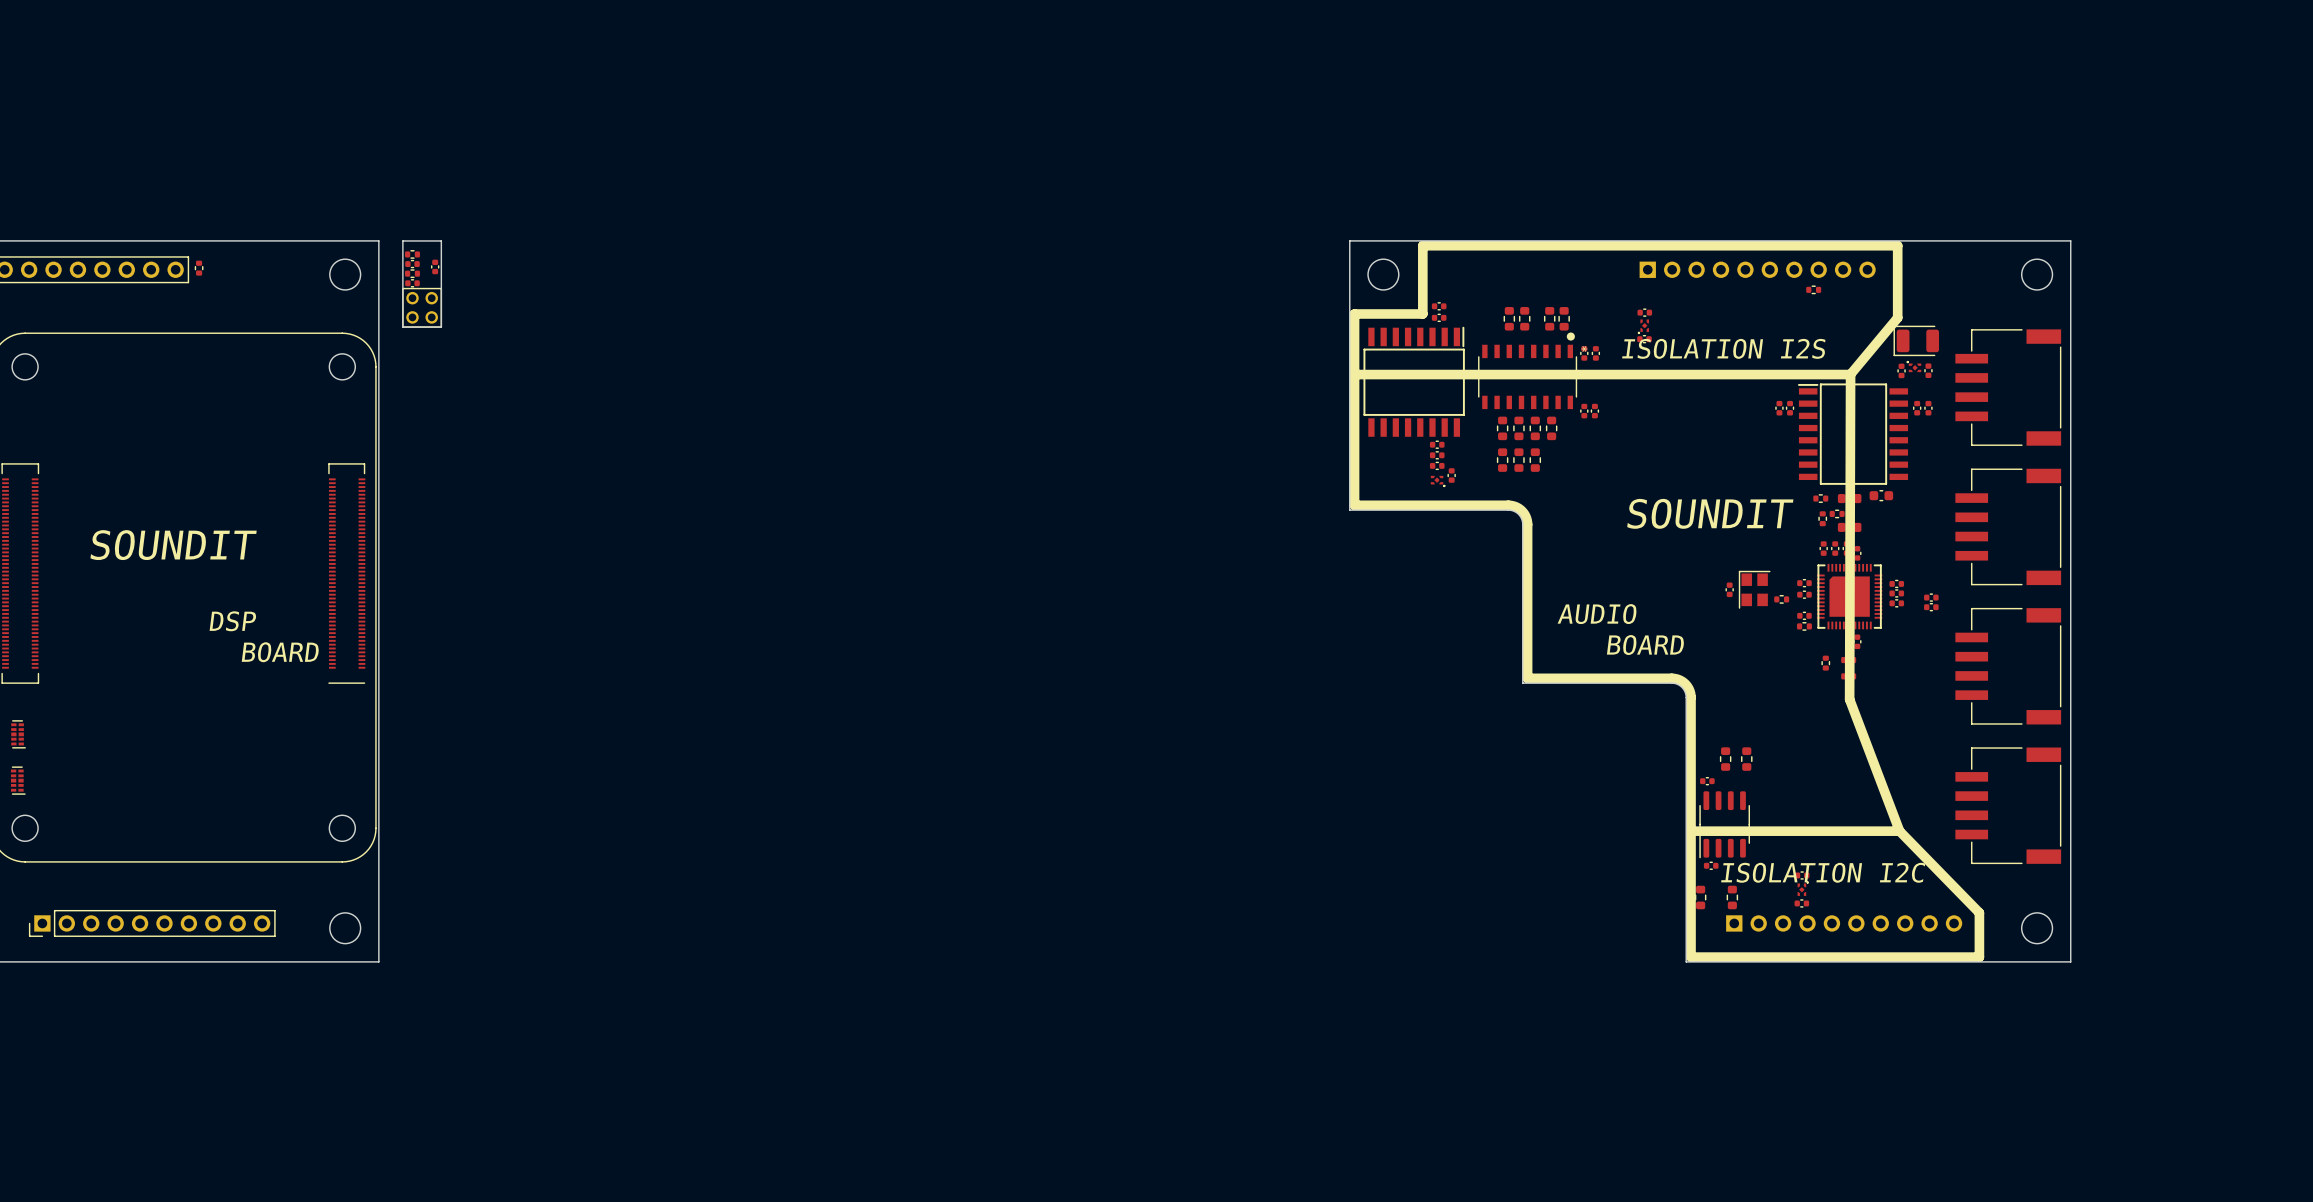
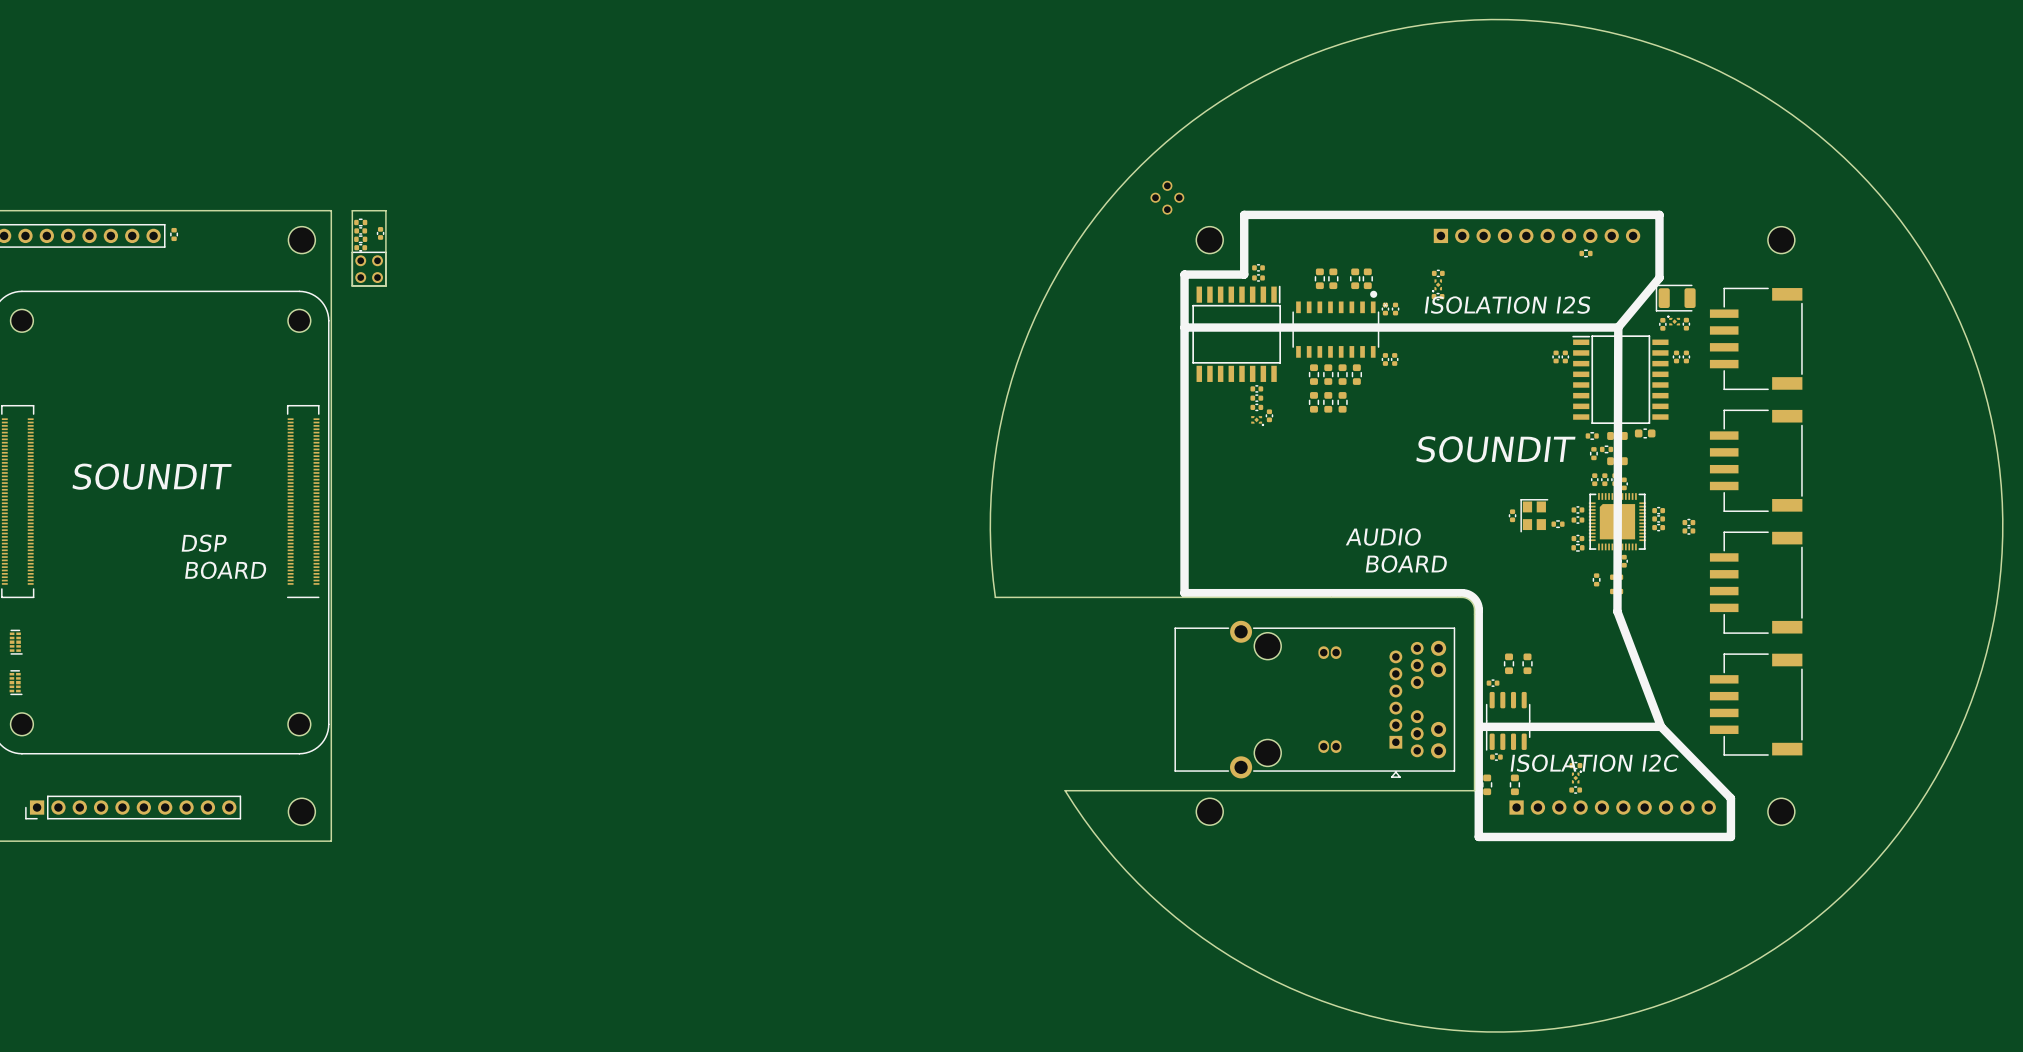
part: none -> (1167, 197)
line: (1354, 505) (1508, 505) (1521, 510) (1527, 524) (1527, 678) -> (1184, 441) (1184, 593) (1335, 593)
board edge: (1522, 683) (1522, 524) (1518, 514) (1508, 510) (1349, 510) (1349, 240) (2070, 240) (2070, 961) (1686, 961) (1686, 904) -> (1331, 597) (995, 597) (990, 530) (991, 496) (996, 445) (1011, 380) (1035, 316) (1058, 271) (1076, 243) (1117, 189) (1166, 142) (1220, 101) (1263, 76) (1309, 55) (1341, 43) (1390, 30) (1440, 22) (1491, 19) (1541, 21) (1575, 25) (1625, 36) (1673, 51) (1719, 71) (1764, 96) (1792, 114) (1831, 146) (1868, 181) (1900, 220) (1929, 262) (1953, 307) (1972, 353) (1987, 402) (1997, 452) (2002, 502) (2002, 553) (1996, 603) (1986, 653) (1971, 701) (1951, 748) (1926, 792) (1898, 834) (1865, 872) (1828, 907) (1788, 939) (1746, 966) (1700, 989) (1653, 1007) (1604, 1020) (1554, 1028) (1503, 1031) (1453, 1030) (1403, 1023) (1353, 1011) (1306, 994) (1260, 973) (1216, 947) (1175, 917) (1138, 883) (1093, 832) (1065, 790) (1474, 790)
part: none -> (1314, 699)
part: none -> (1209, 811)

